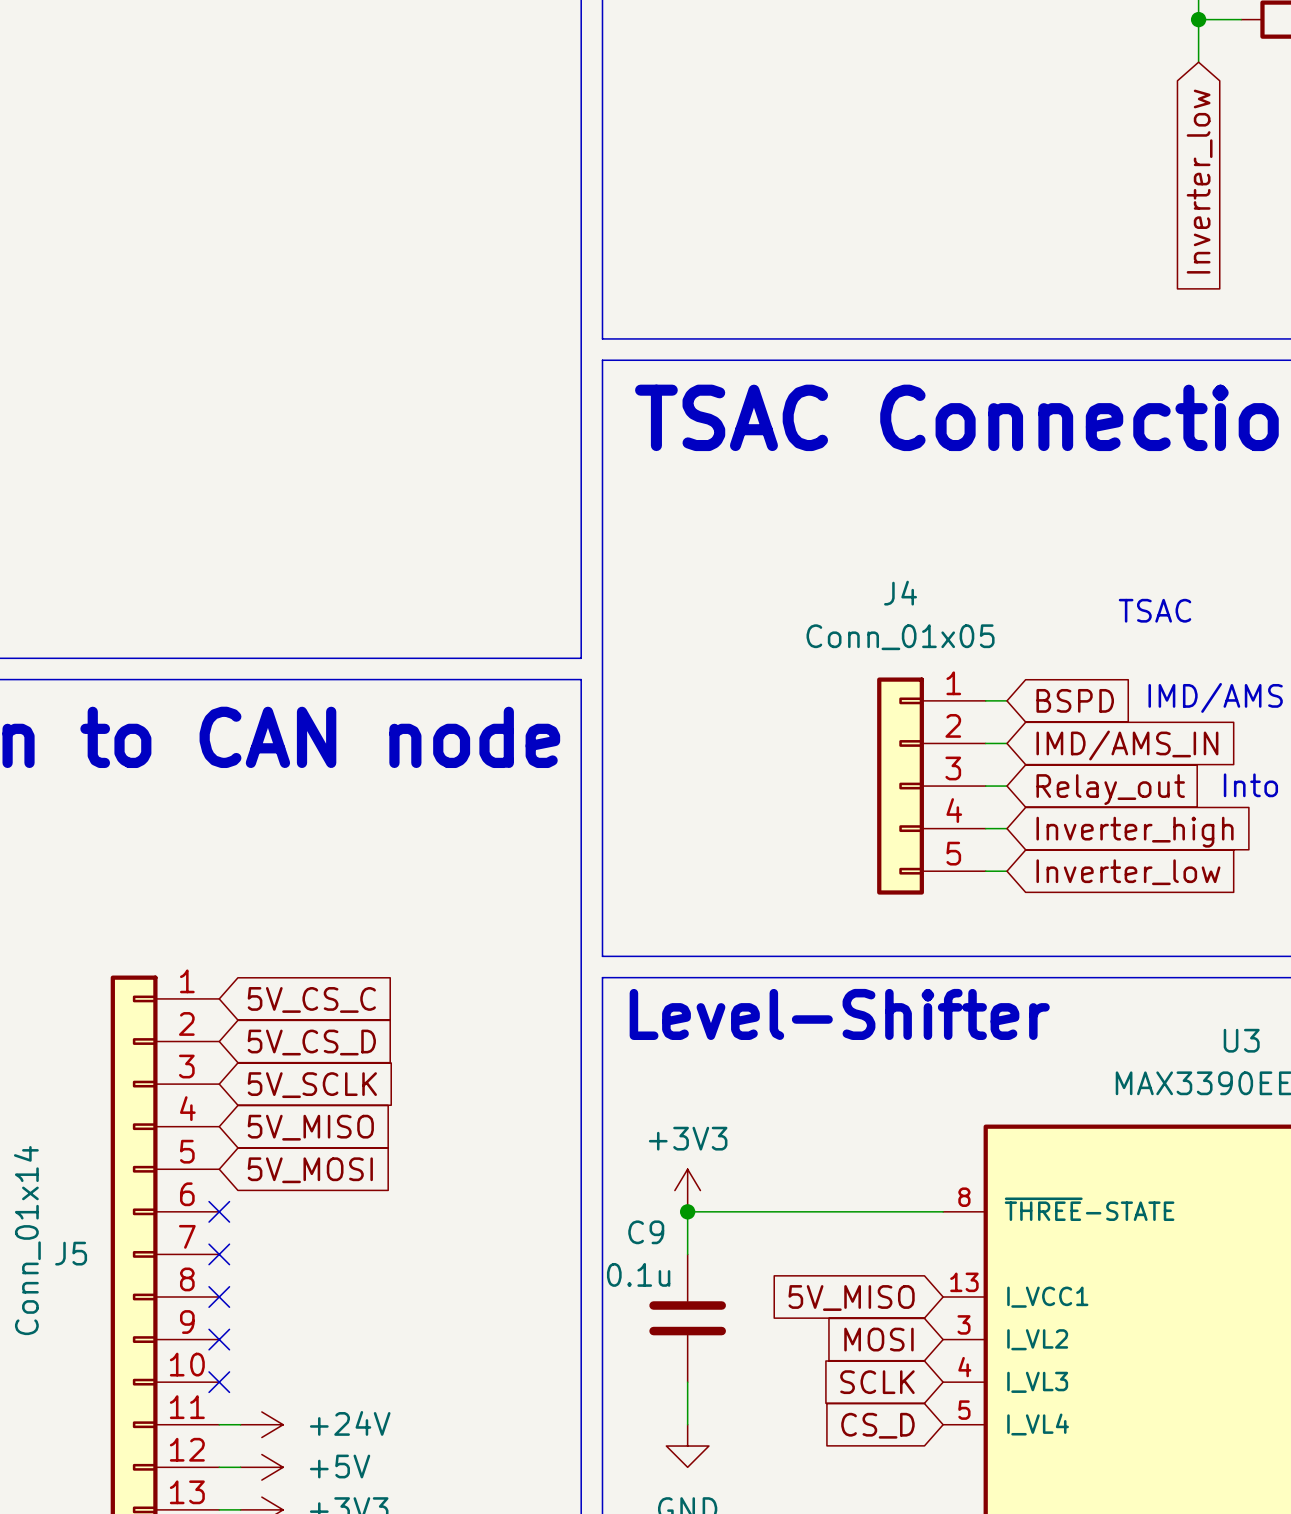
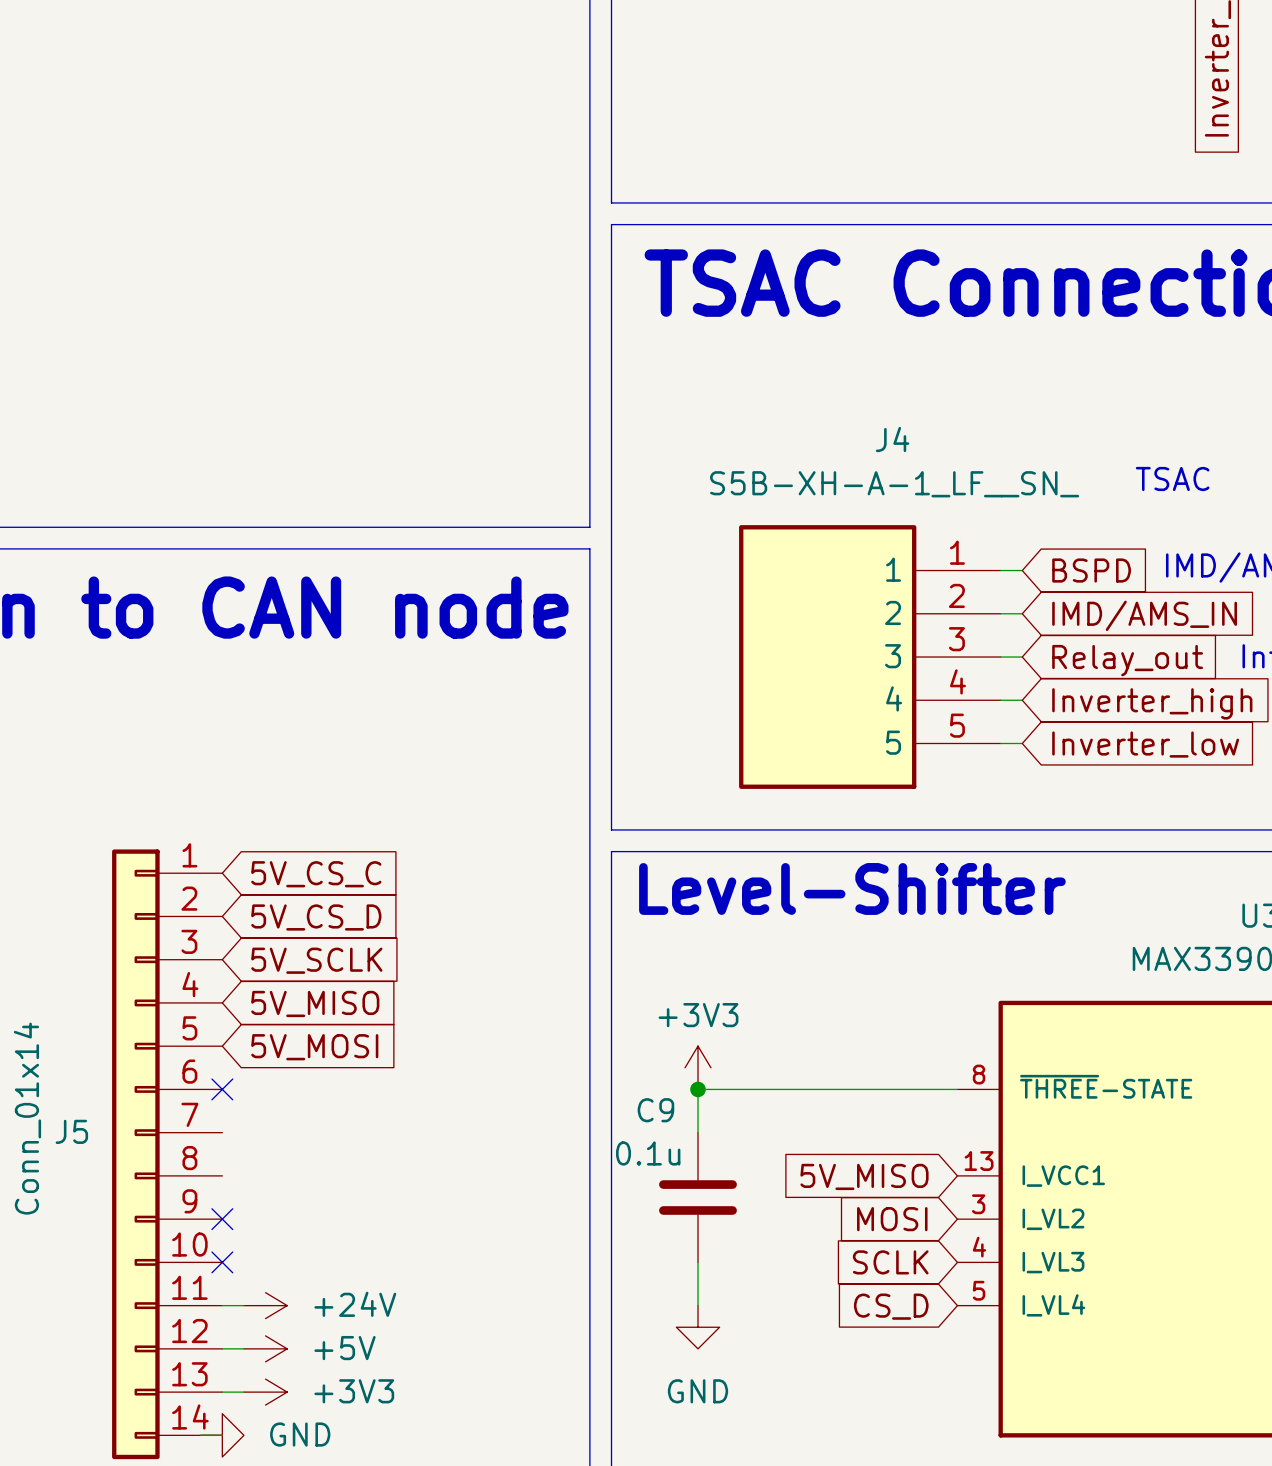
J4 name position: J4 (900, 593) -> J4 (892, 439)
J4 value: Conn_01x05 (900, 637) -> S5B-XH-A-1_LF__SN_ (894, 484)
J4 symbol: [877, 677, 986, 895] -> [739, 525, 1001, 789]
no-connect mark: (219, 1254) -> none
no-connect mark: (219, 1296) -> none

